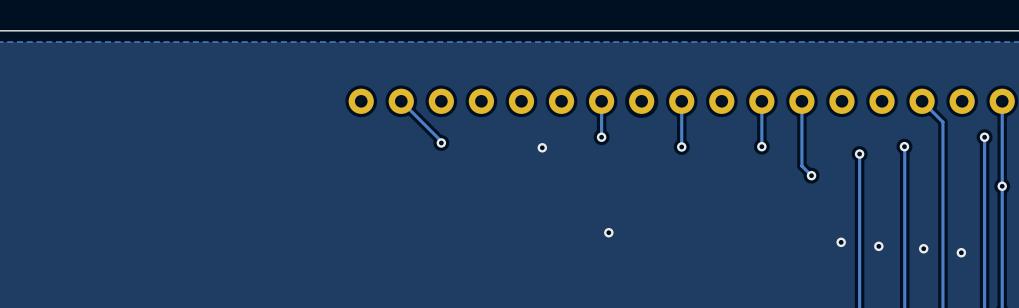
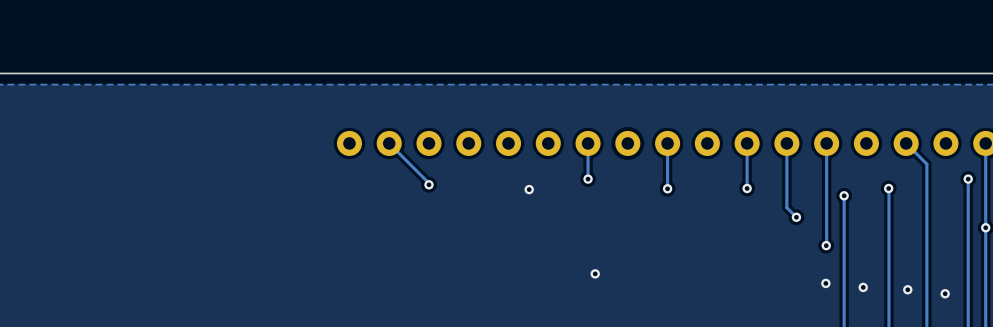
track: none -> (826, 143) (826, 245)
via: none -> (826, 245)

